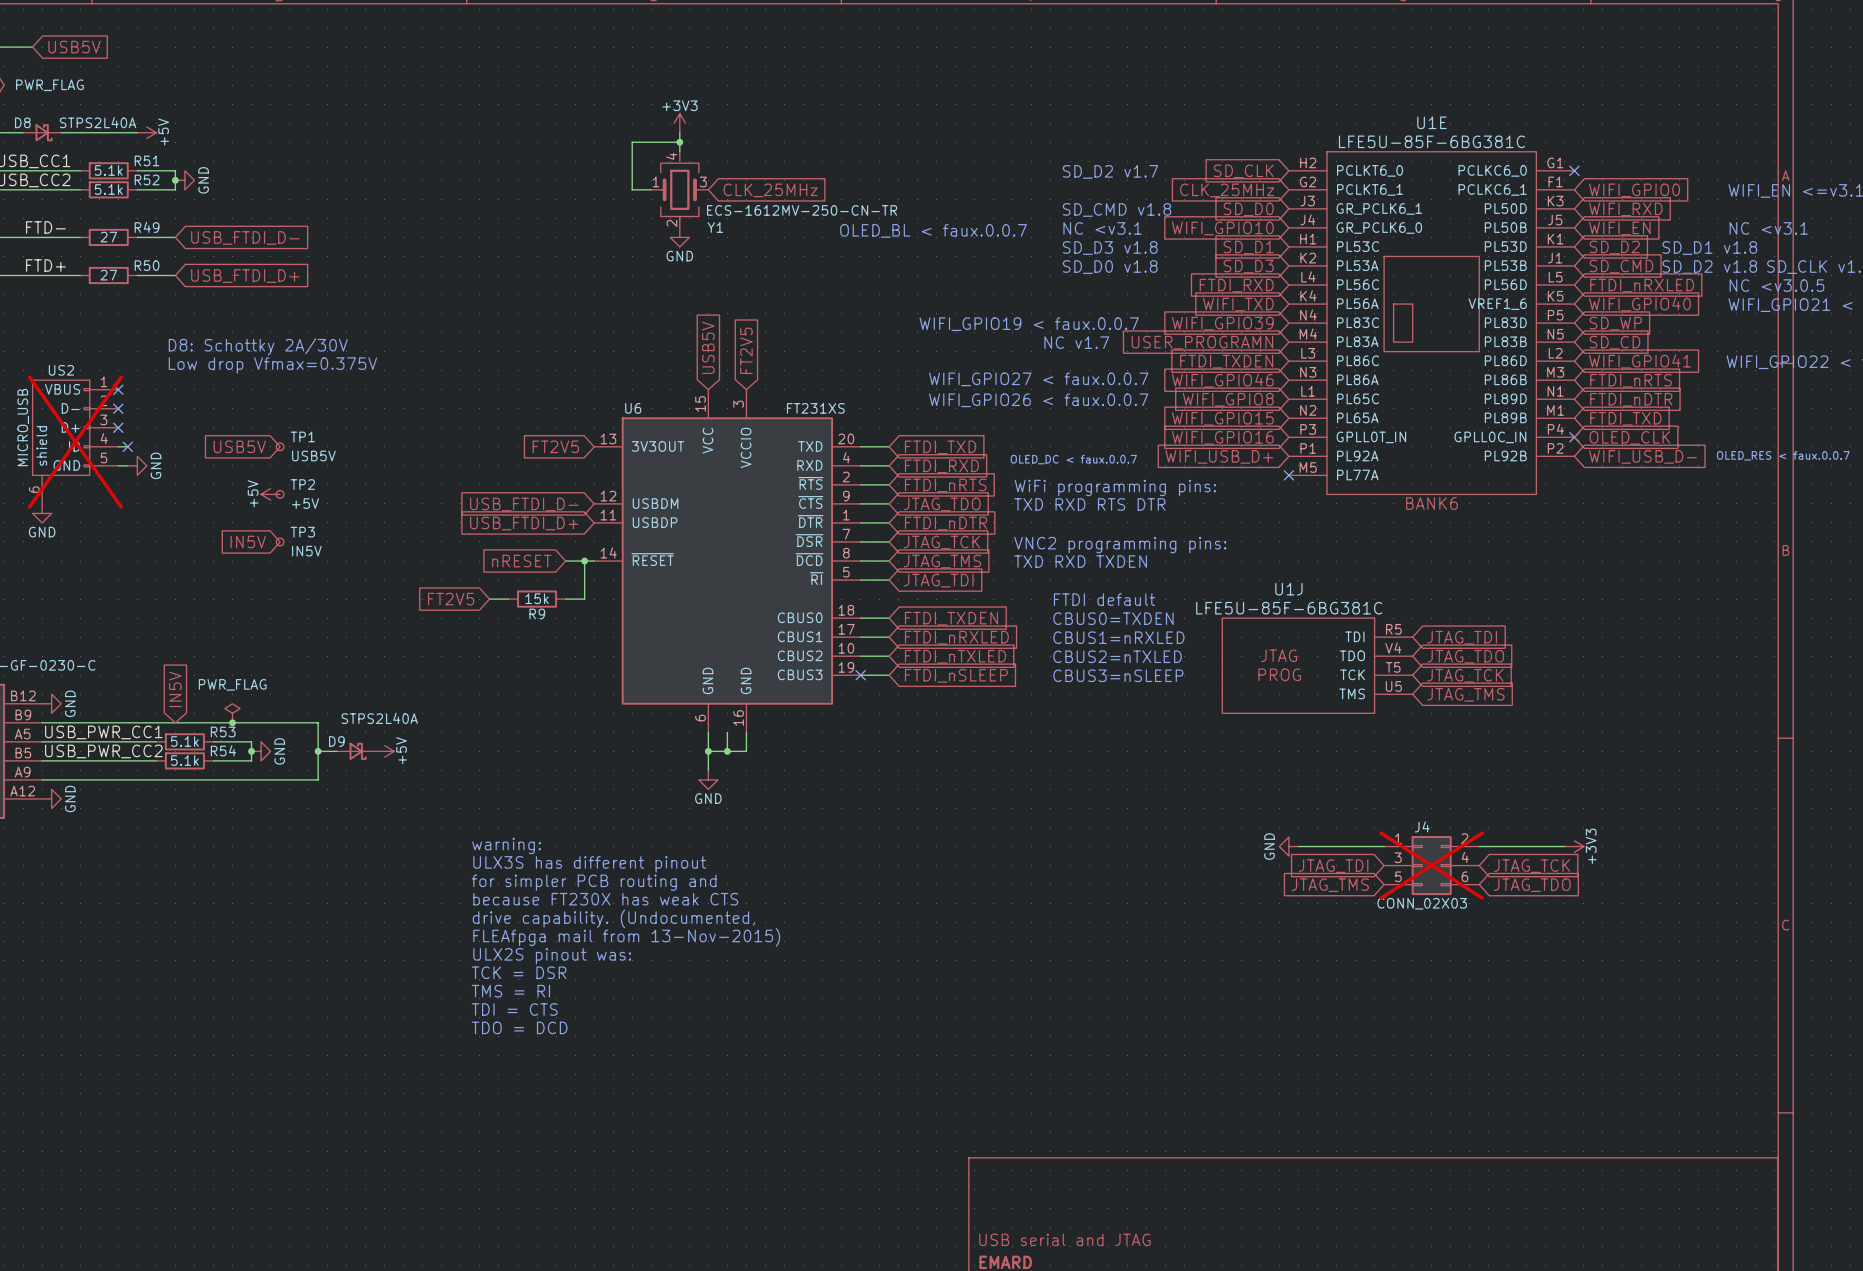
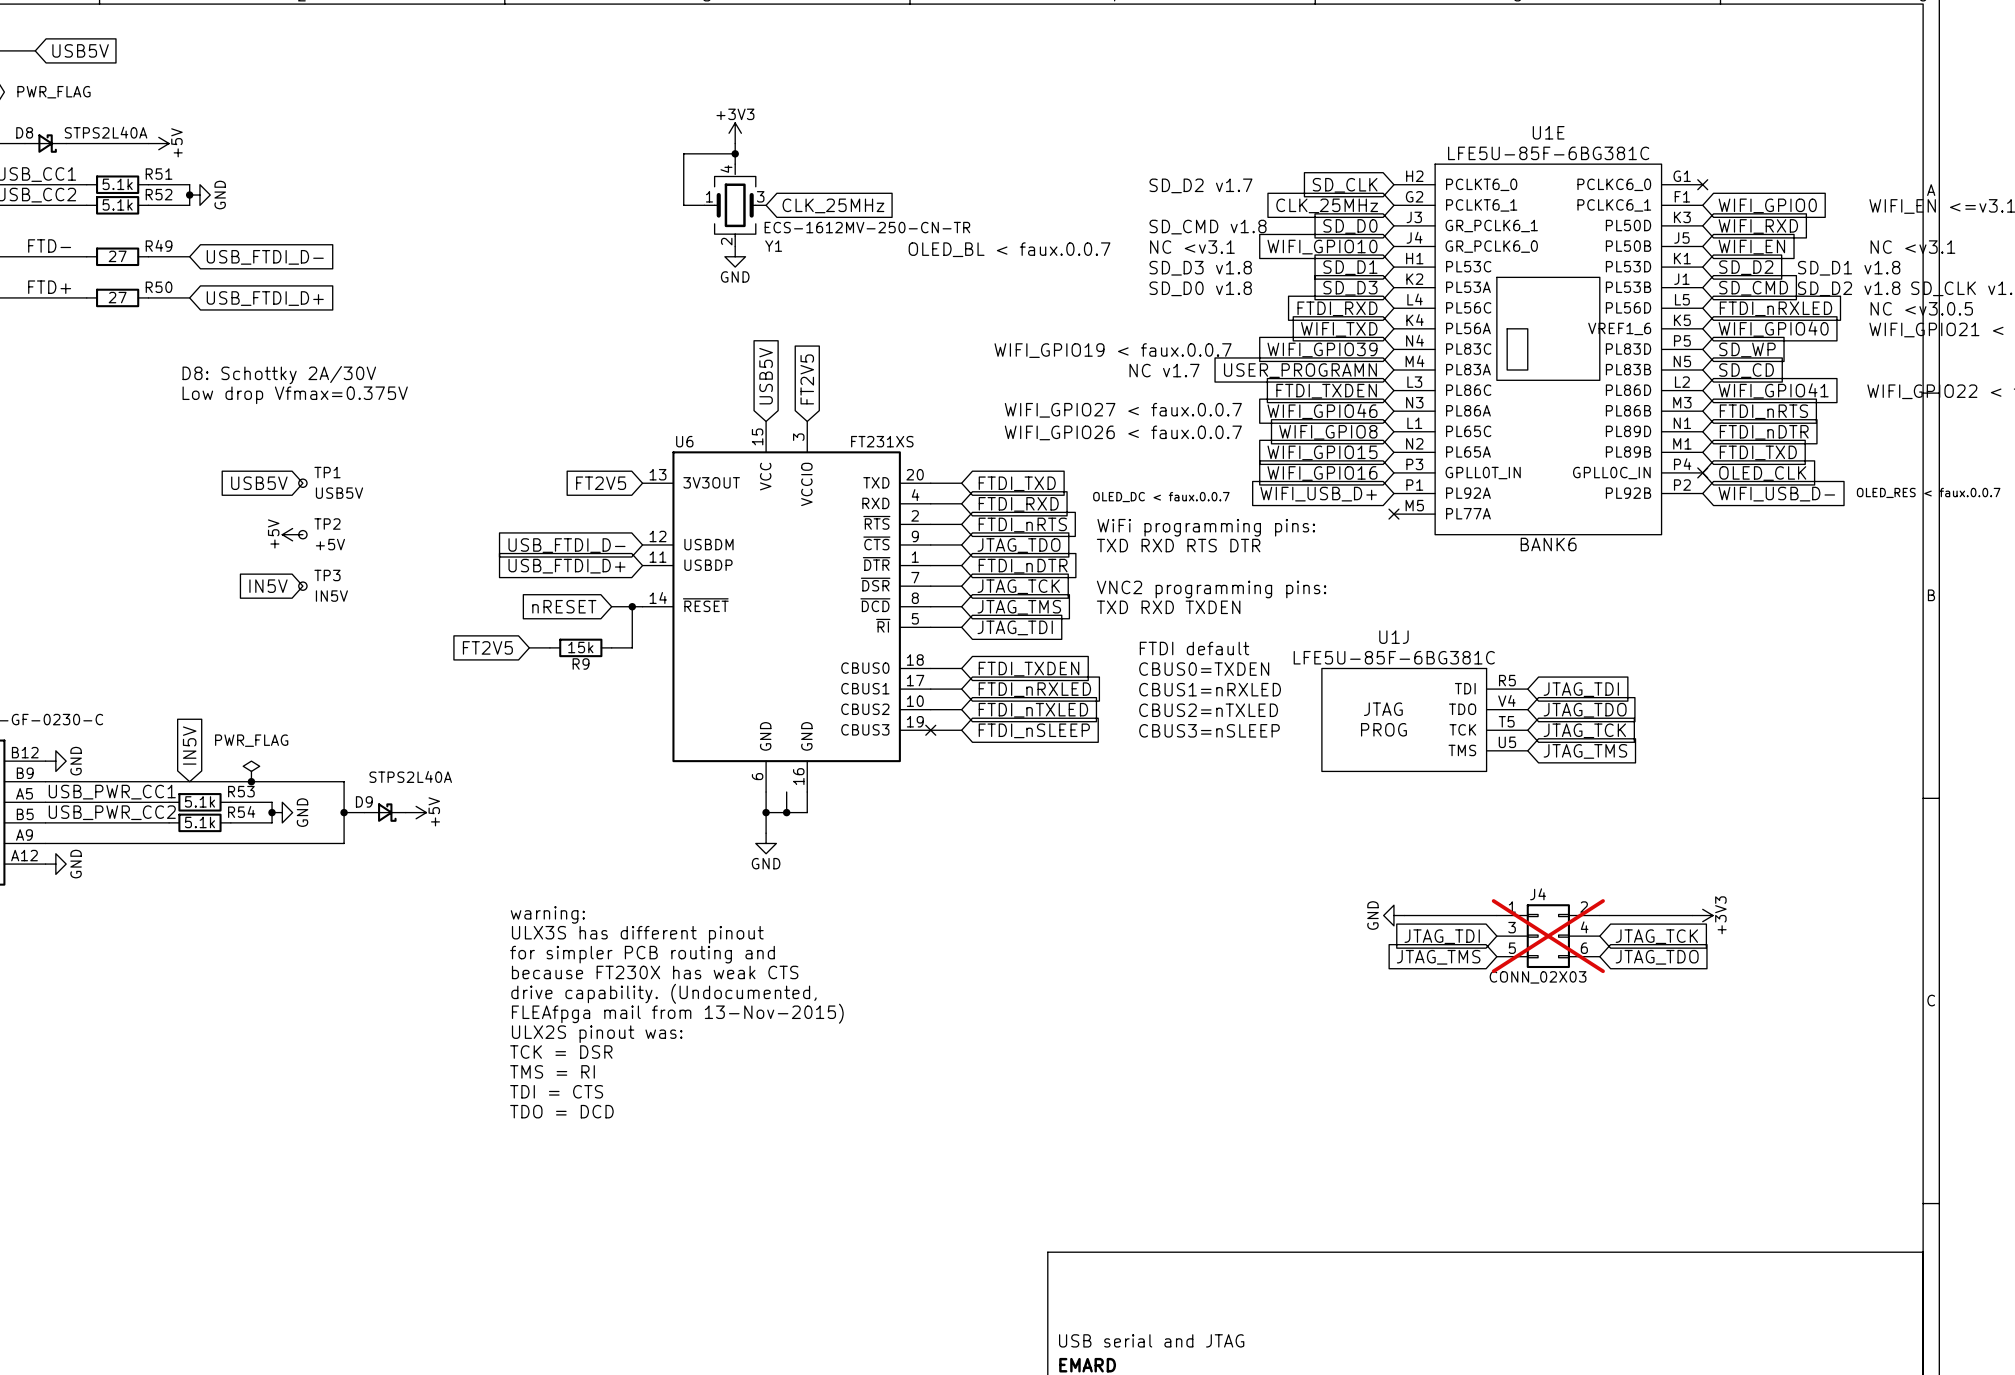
no-connect mark: (118, 389) -> none
no-connect mark: (118, 408) -> none
no-connect mark: (118, 427) -> none
US2: MICRO_USB (75, 442) -> none
wire: (118, 446) (127, 446) -> none
no-connect mark: (127, 446) -> none
wire: (118, 465) (127, 465) -> none
power symbol: GND (137, 465) -> none
power symbol: GND (42, 513) -> none

